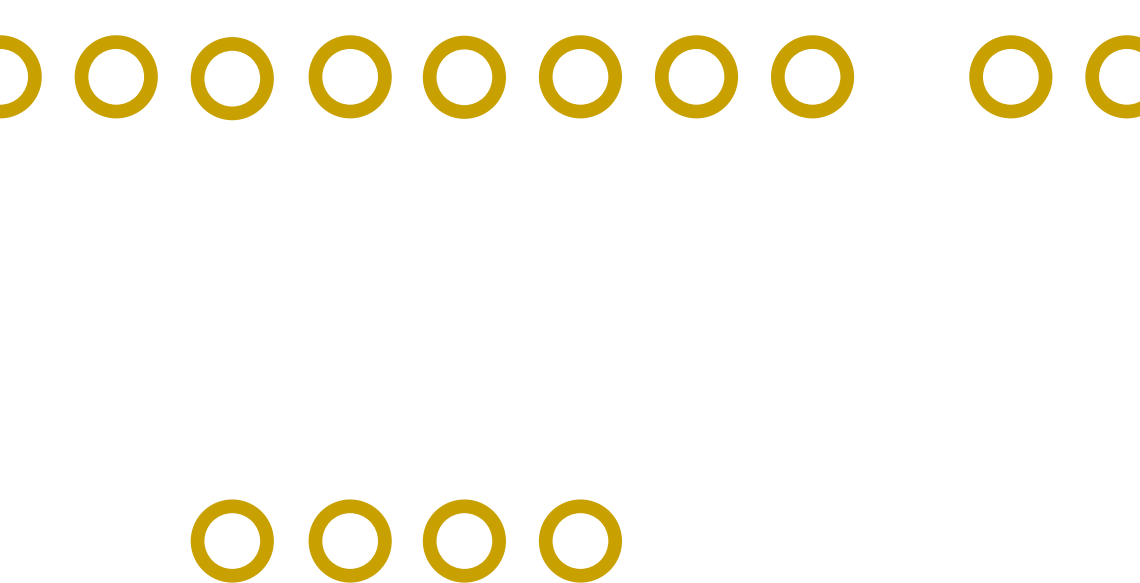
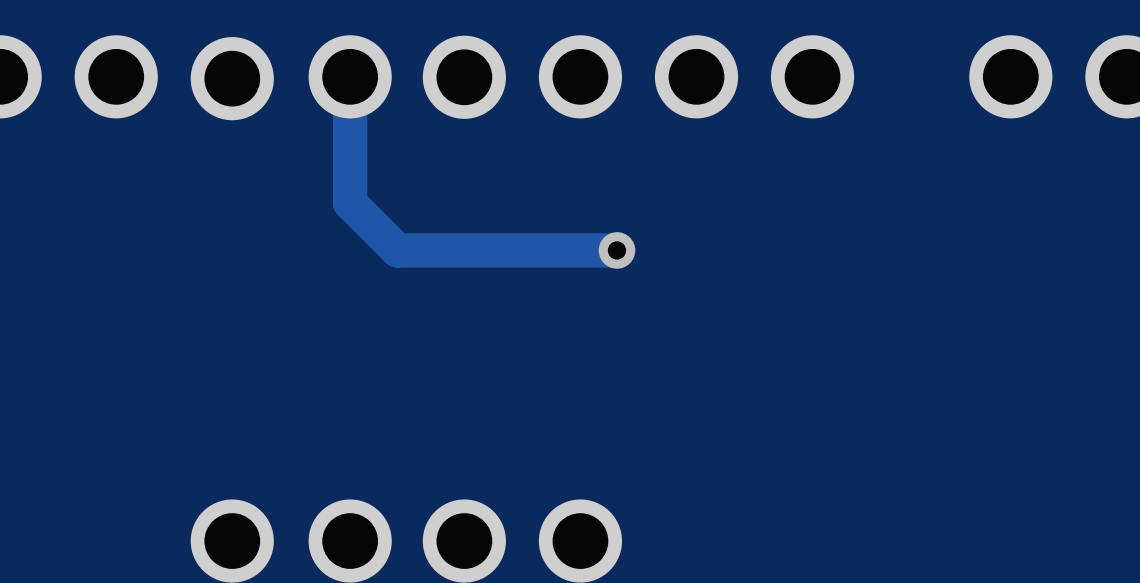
track: none -> (350, 76) (350, 202) (397, 250) (616, 250)
via: none -> (616, 250)

